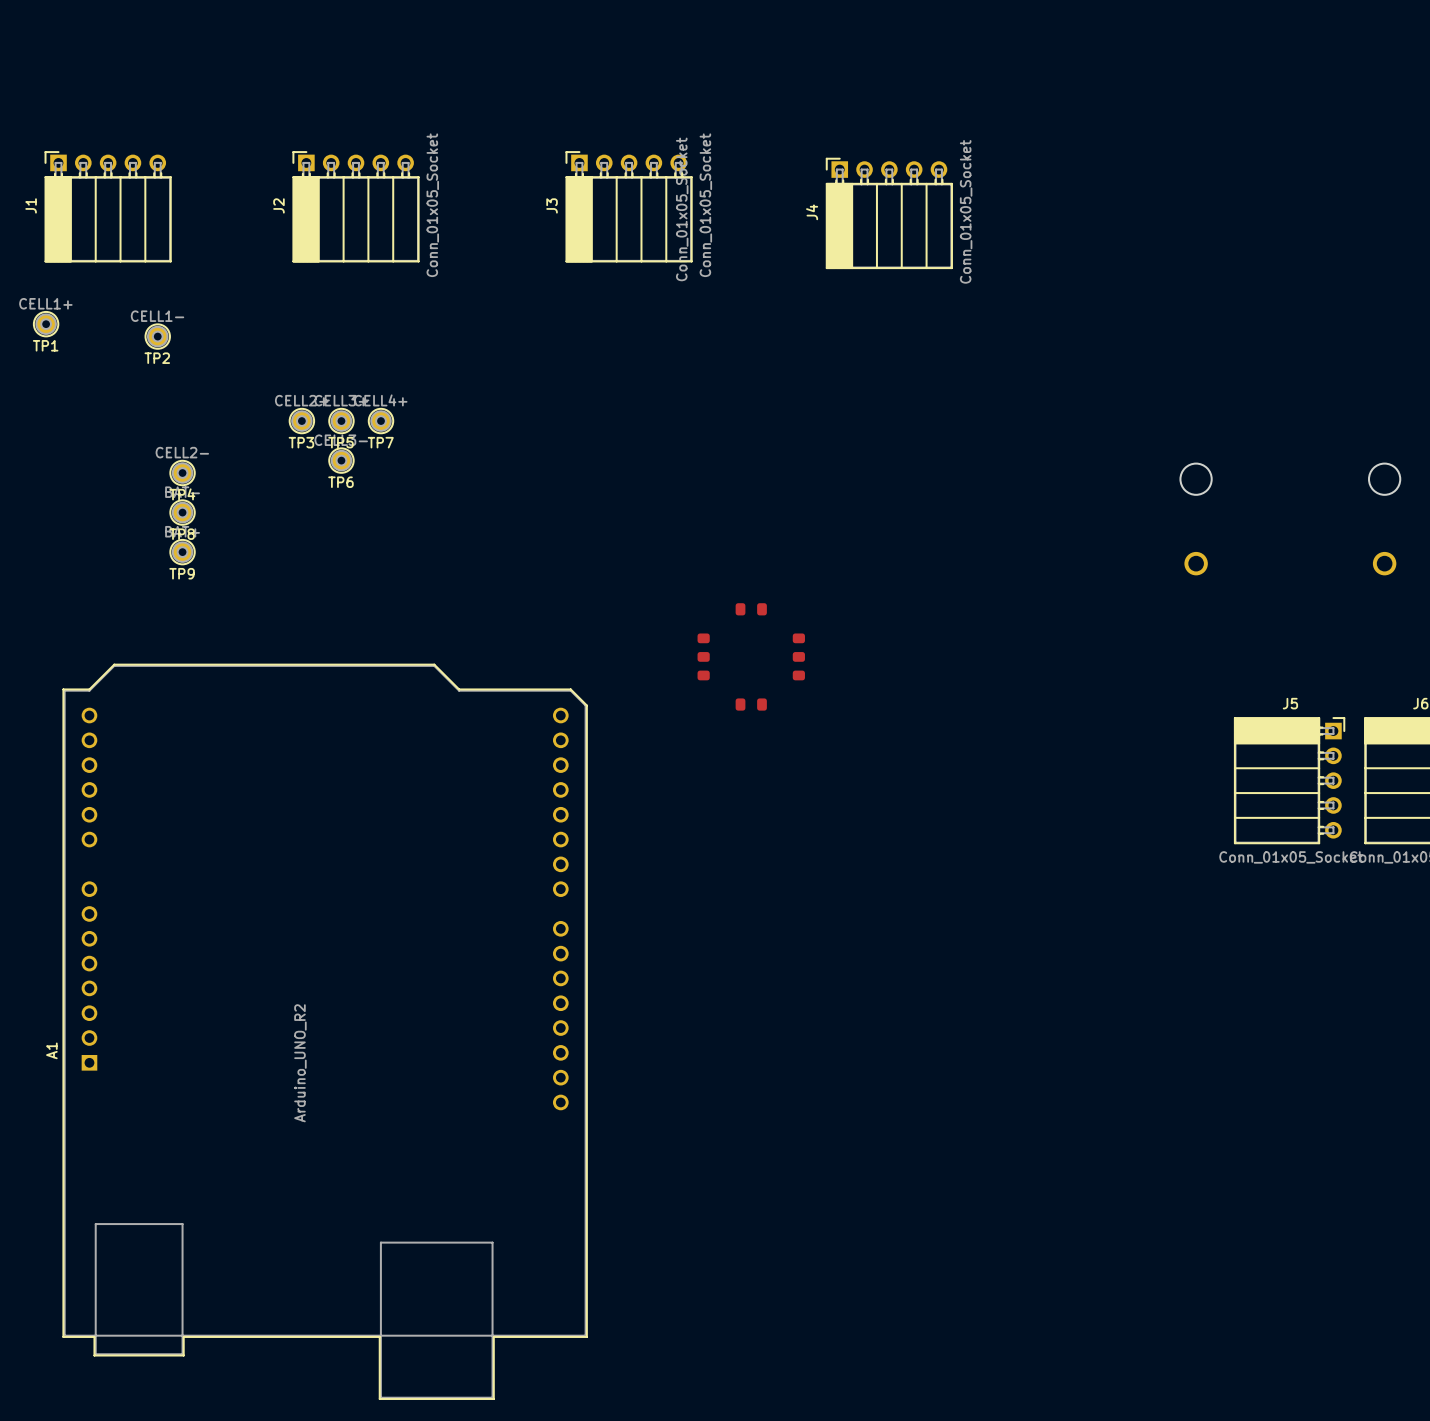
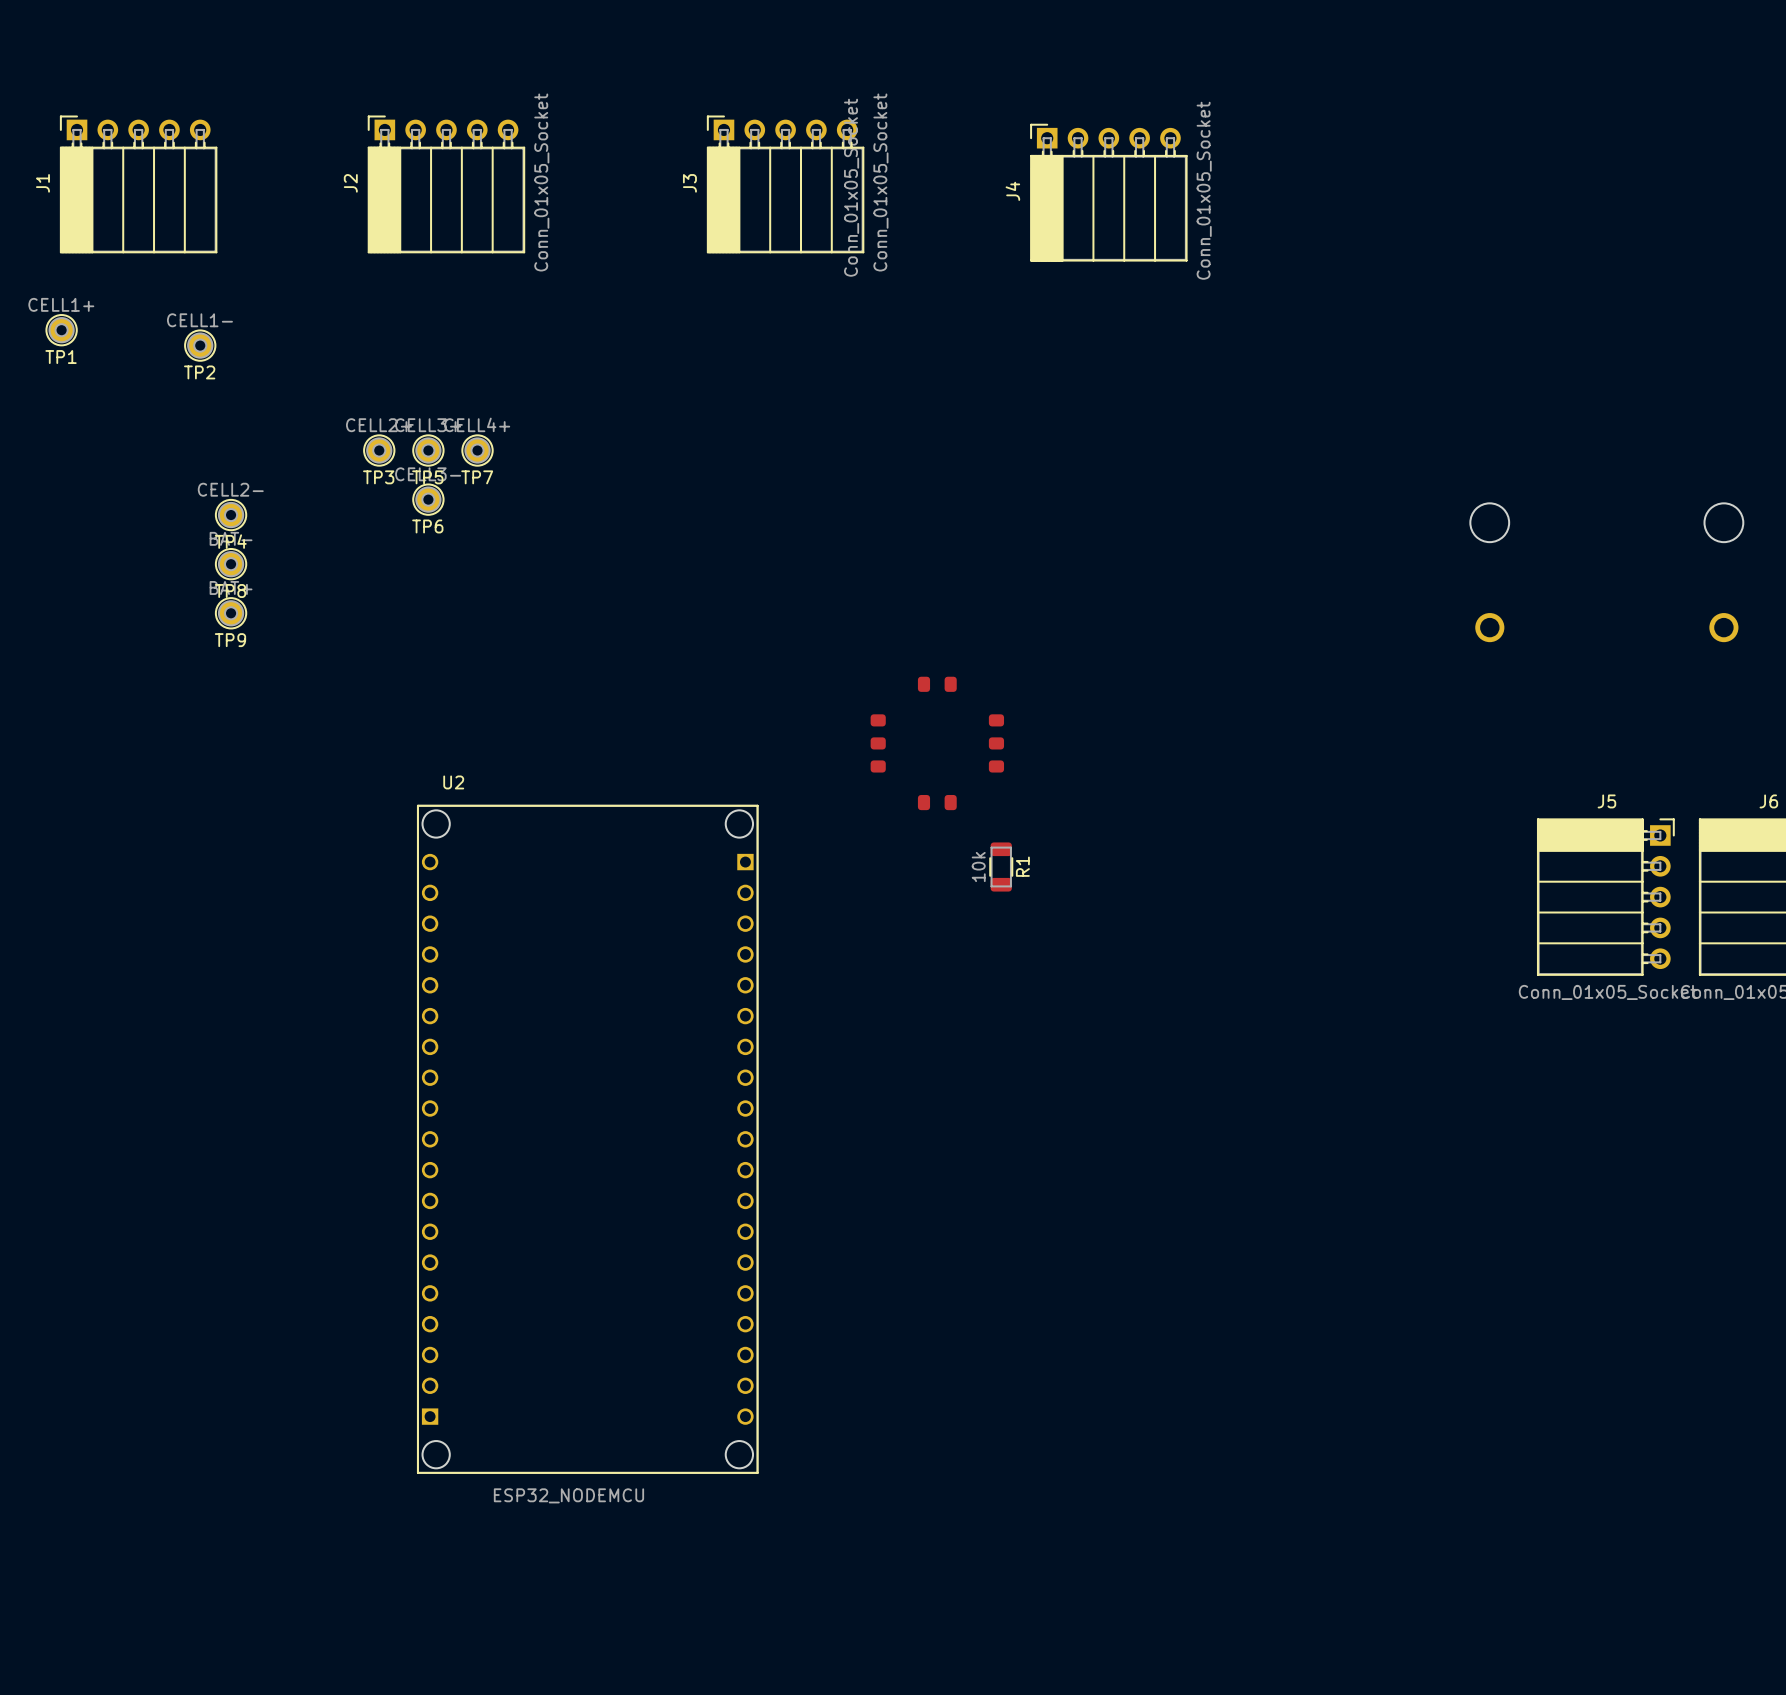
R1: none -> 10k (1001, 867)
U2: none -> ESP32_NODEMCU (587, 1139)
A1: Arduino_UNO_R2 (325, 1031) -> none

